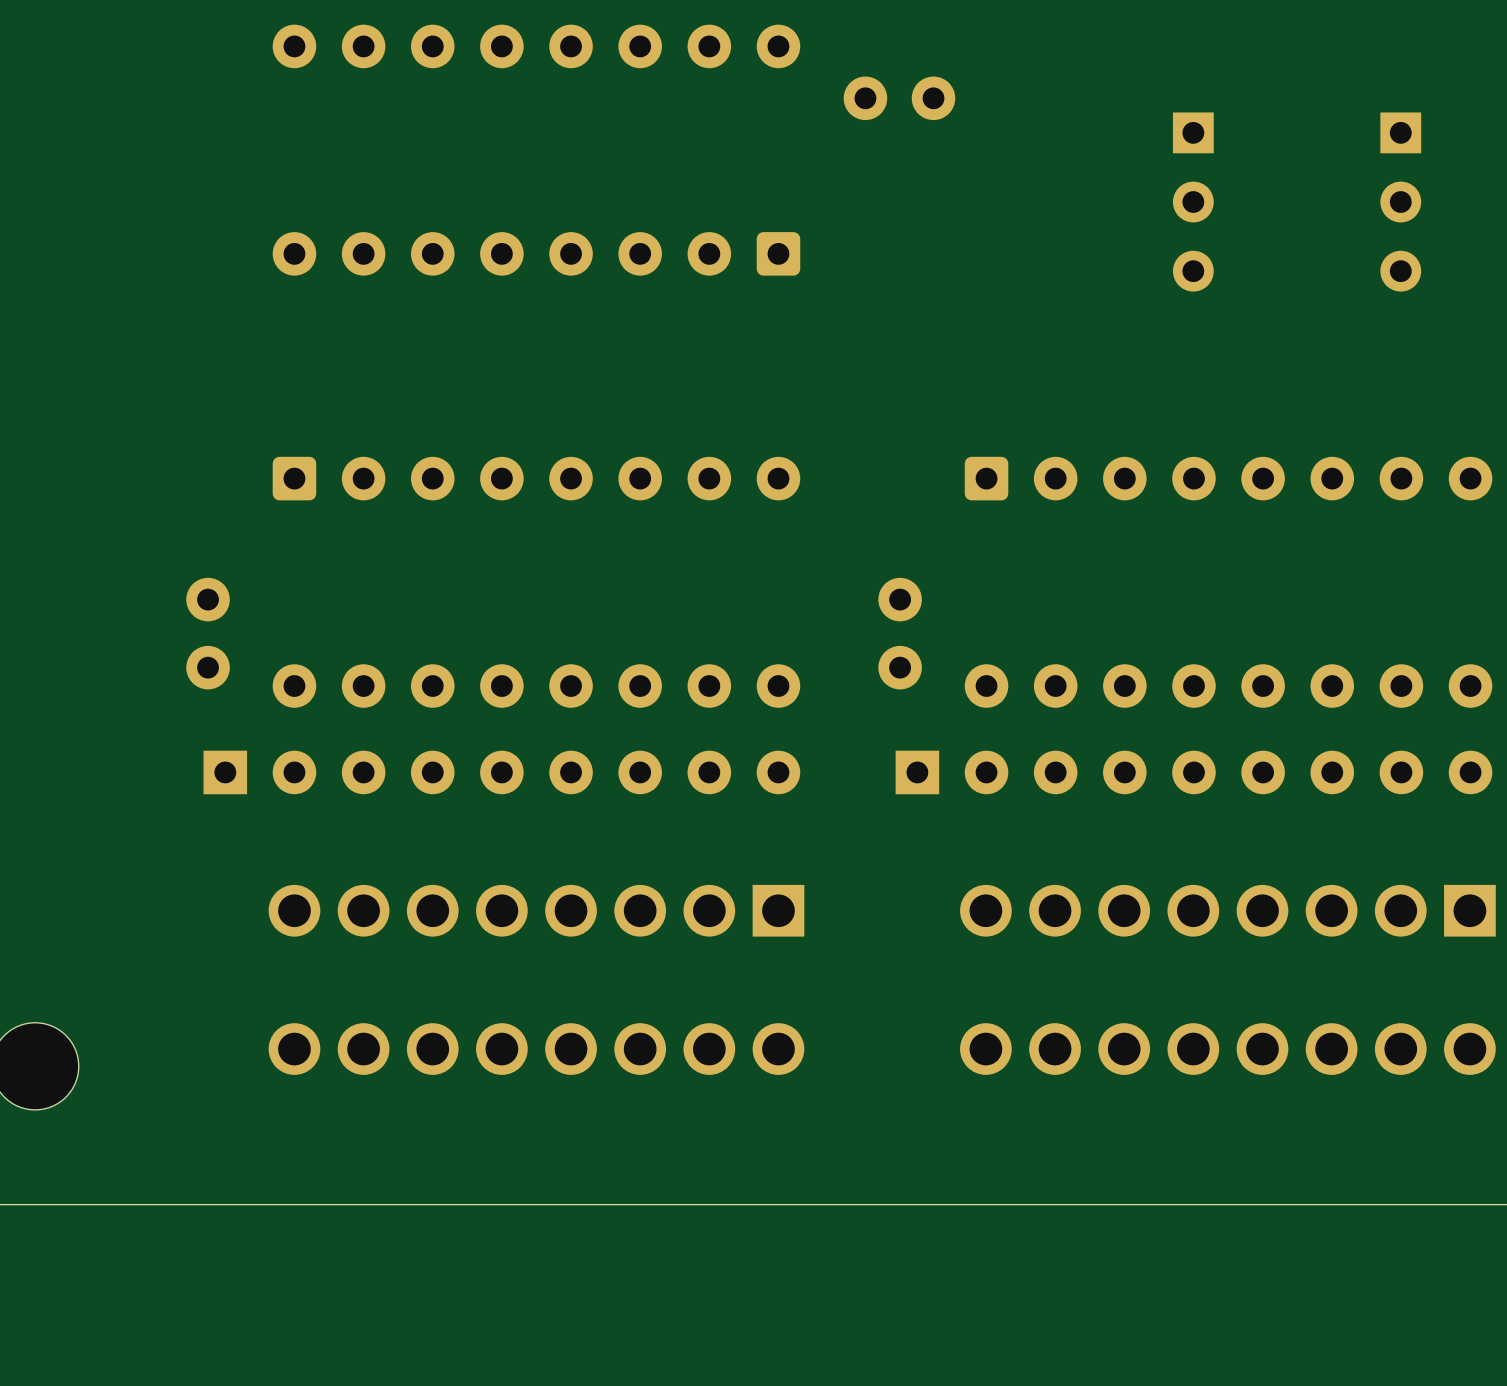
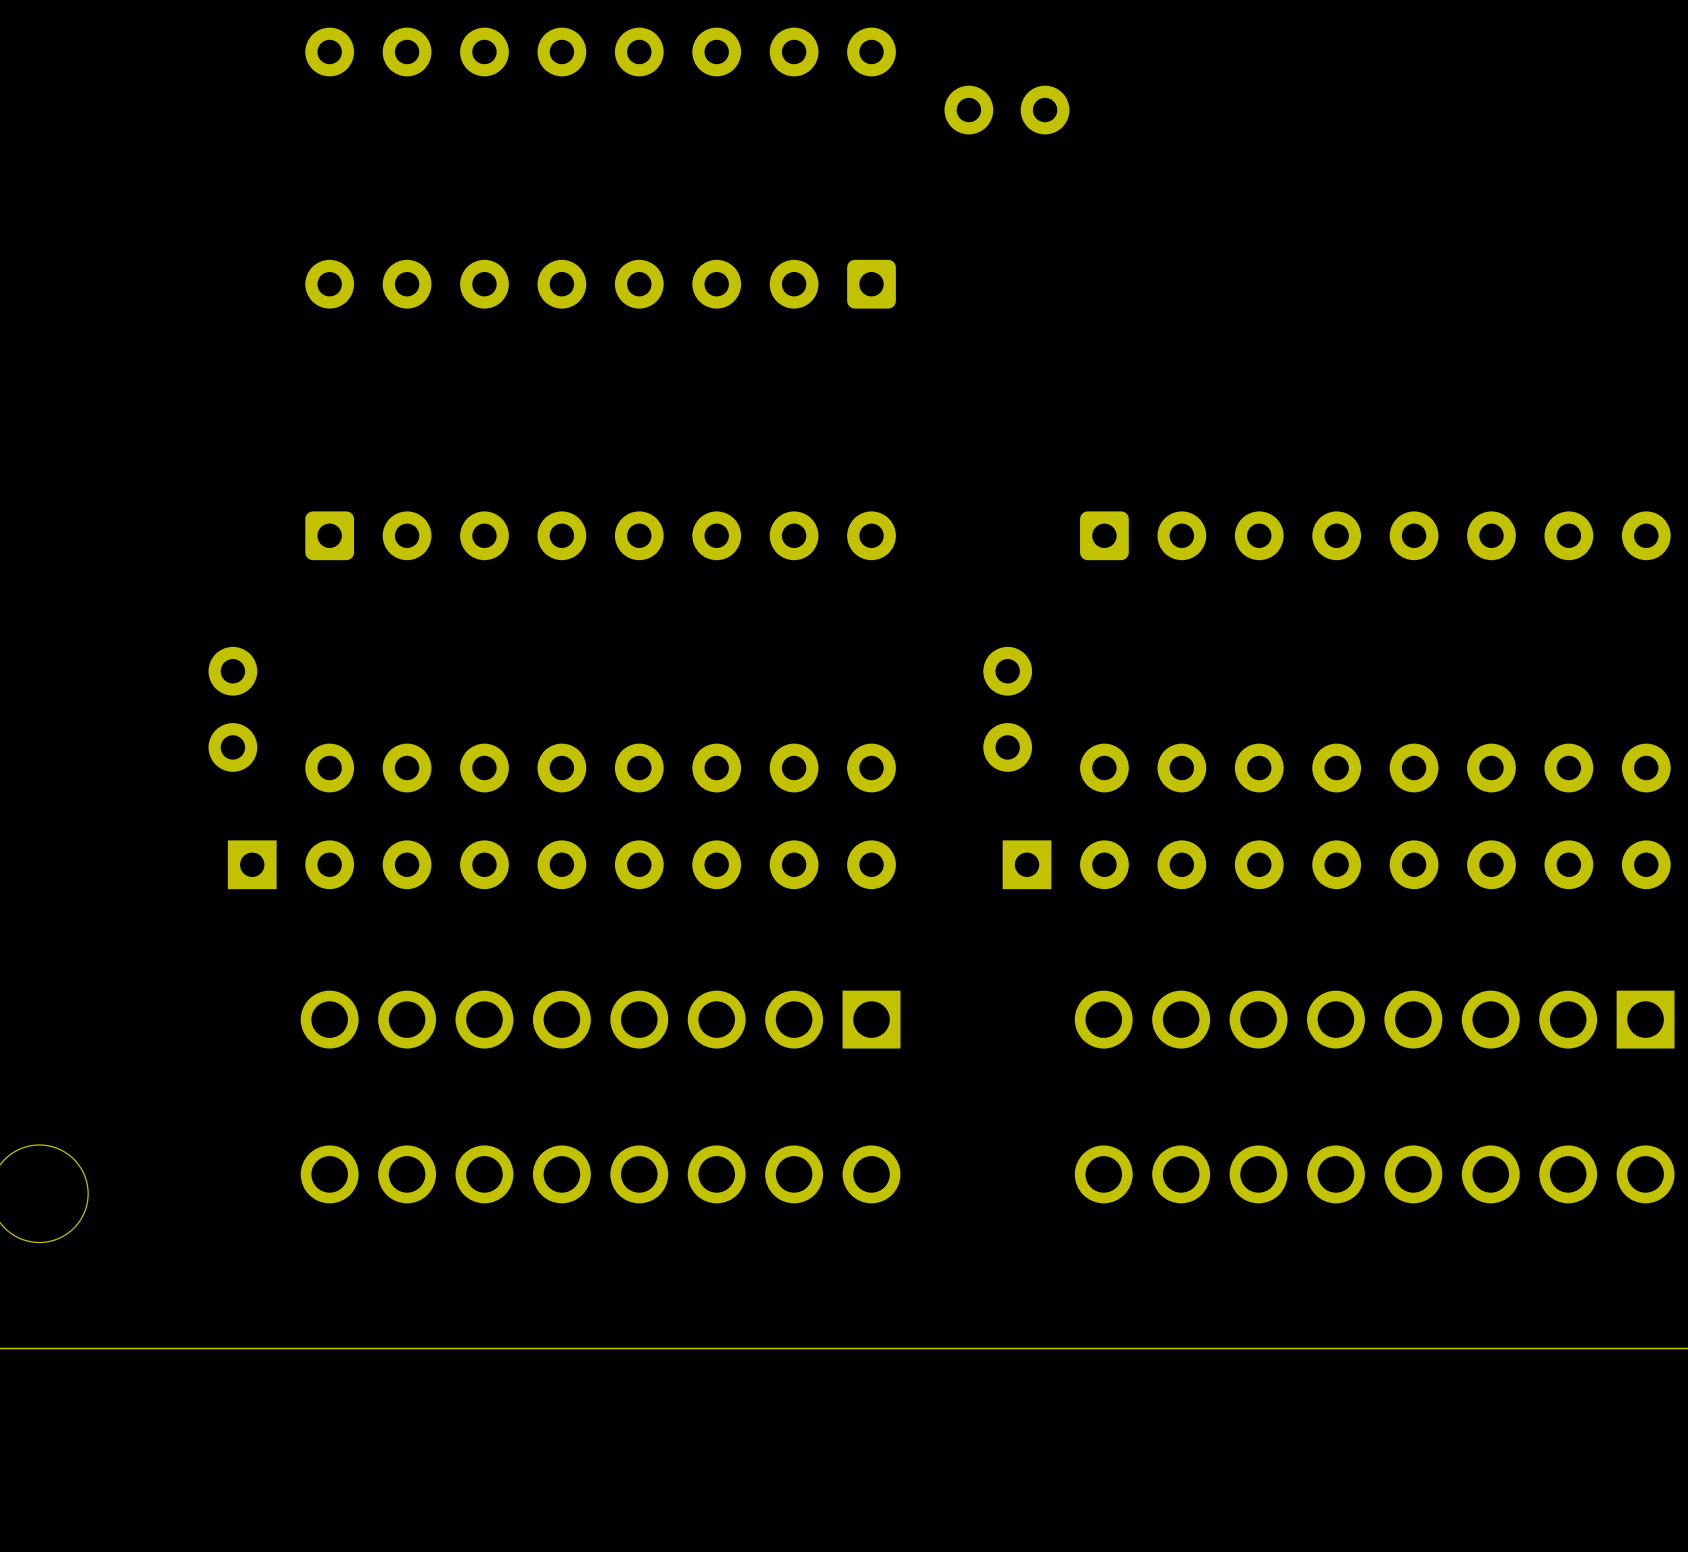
part: (1193, 202) -> none
part: (1400, 202) -> none

